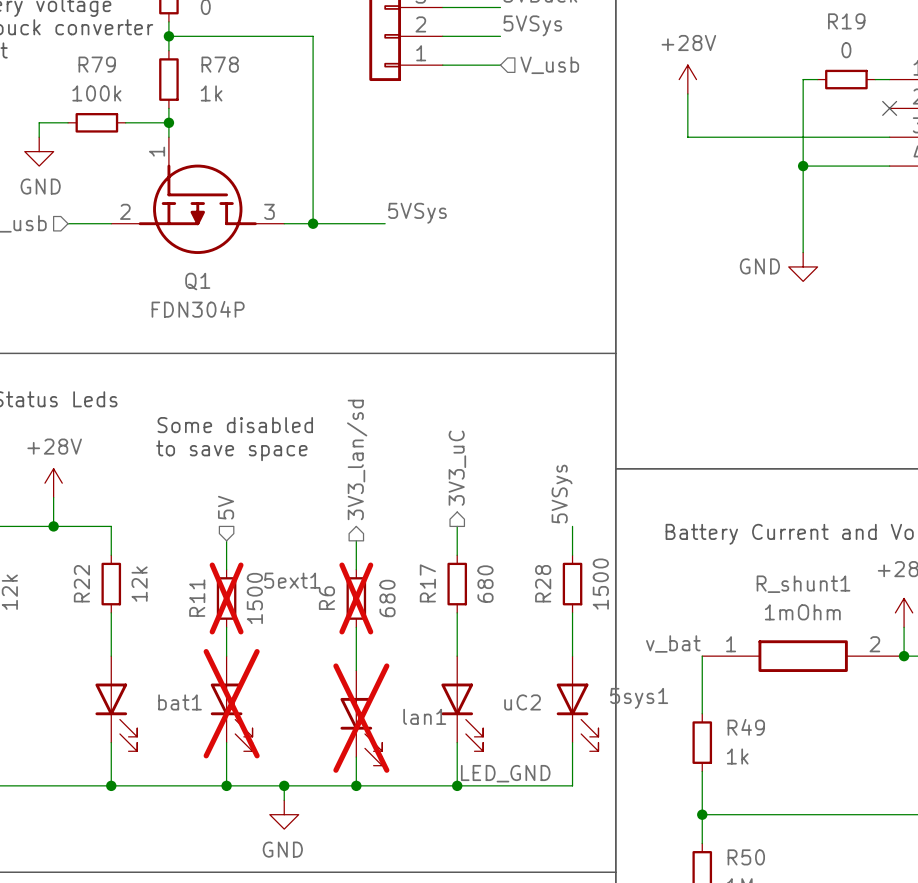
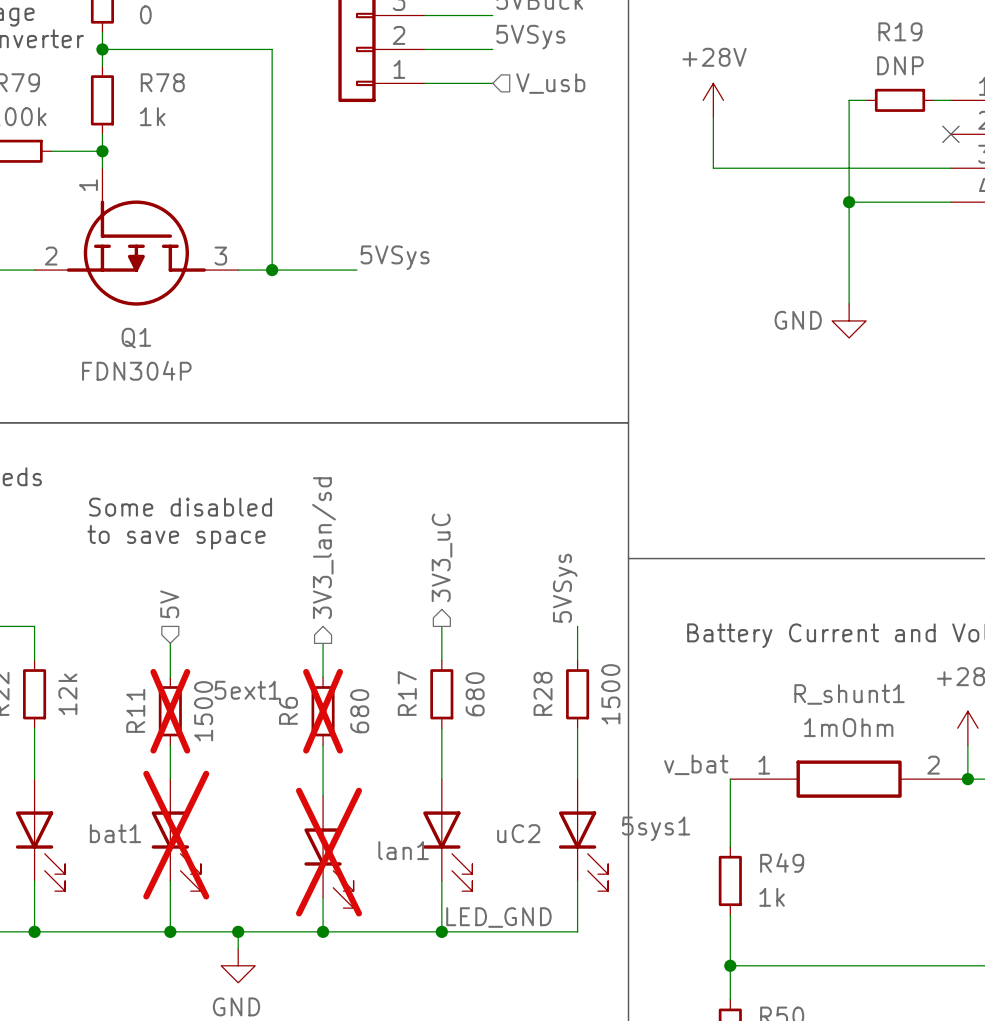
R19 value: 0 (846, 50) -> DNP (900, 65)

